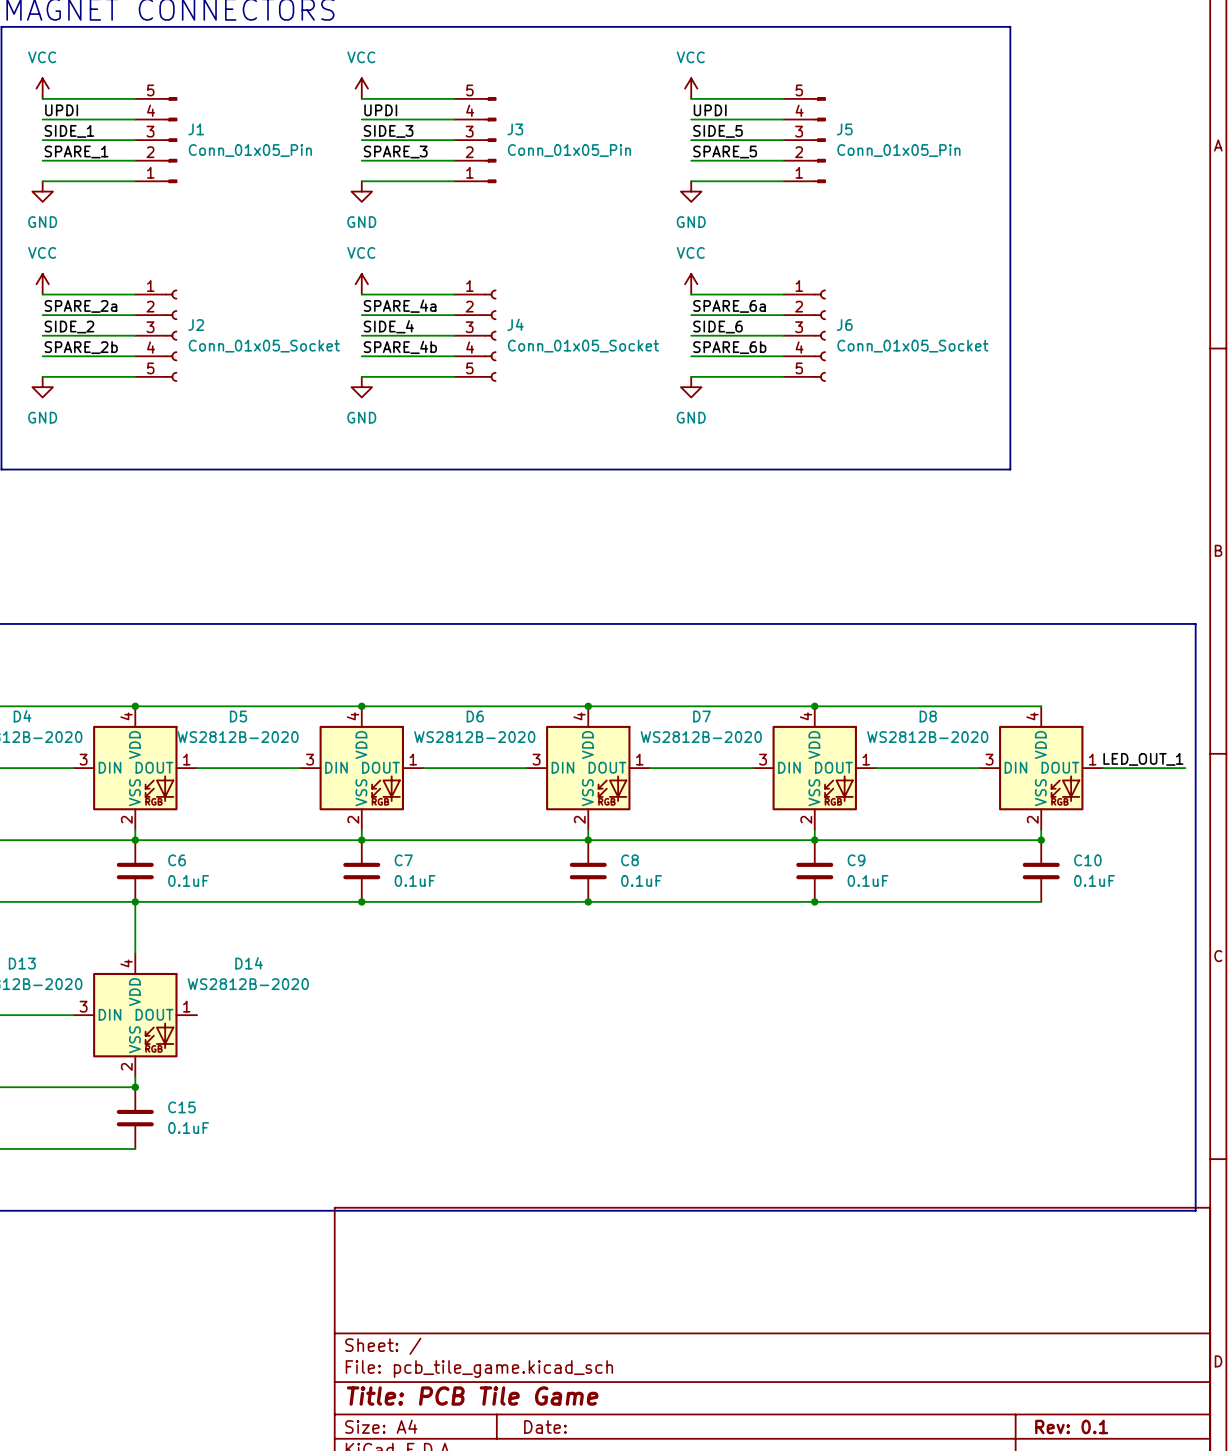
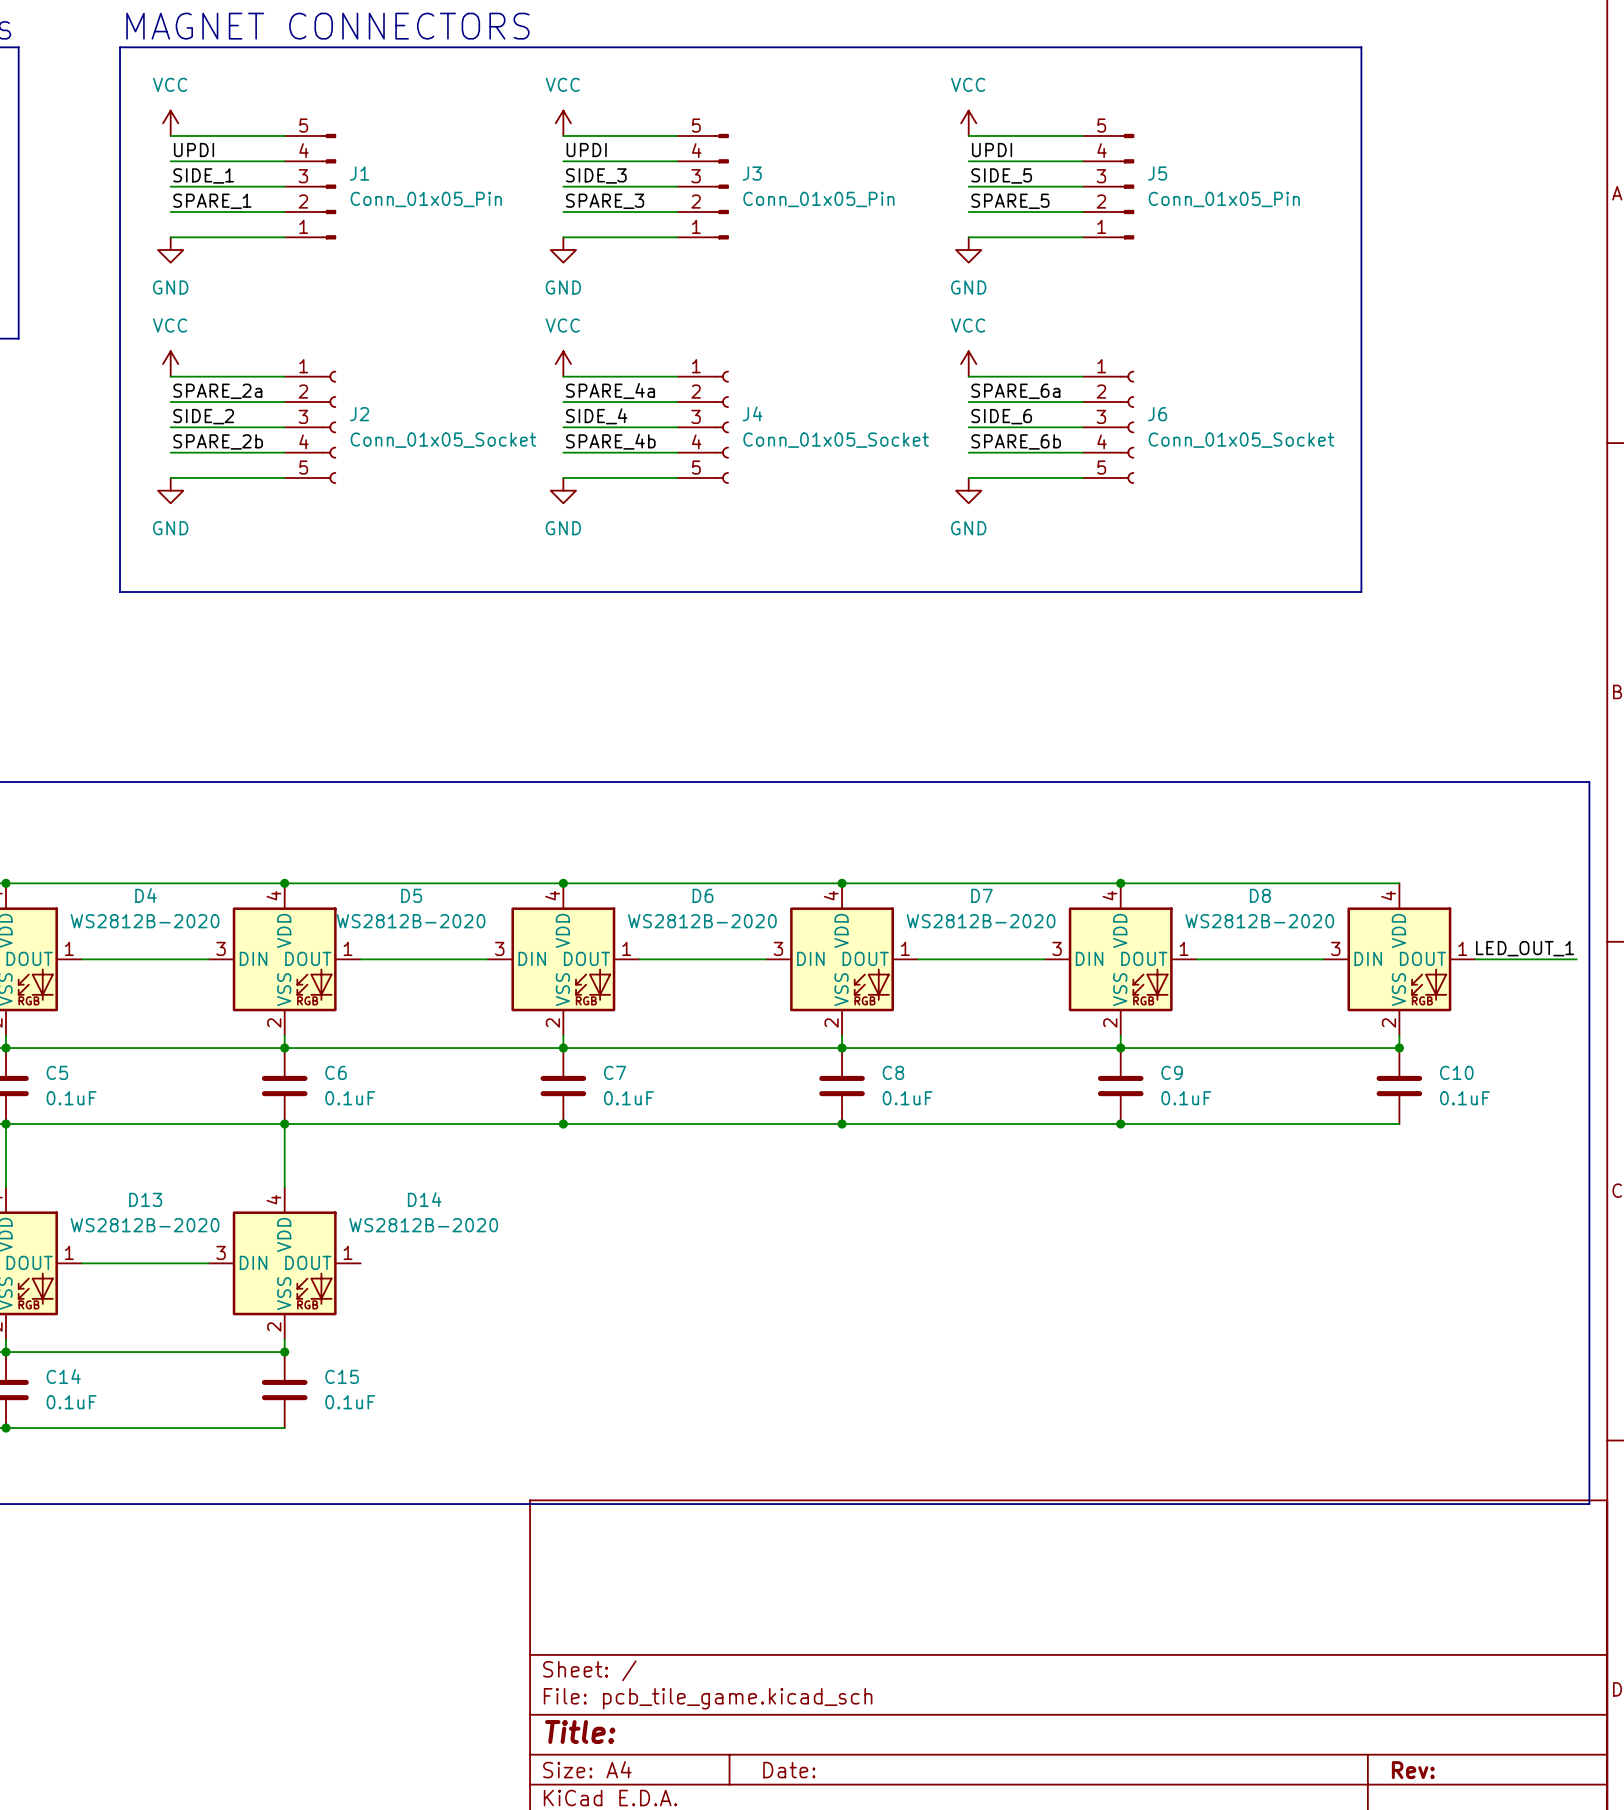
title block: Title: PCB Tile Game (472, 1396) -> Title: (580, 1732)
title block: Rev: 0.1 (1071, 1426) -> Rev: (1413, 1770)

